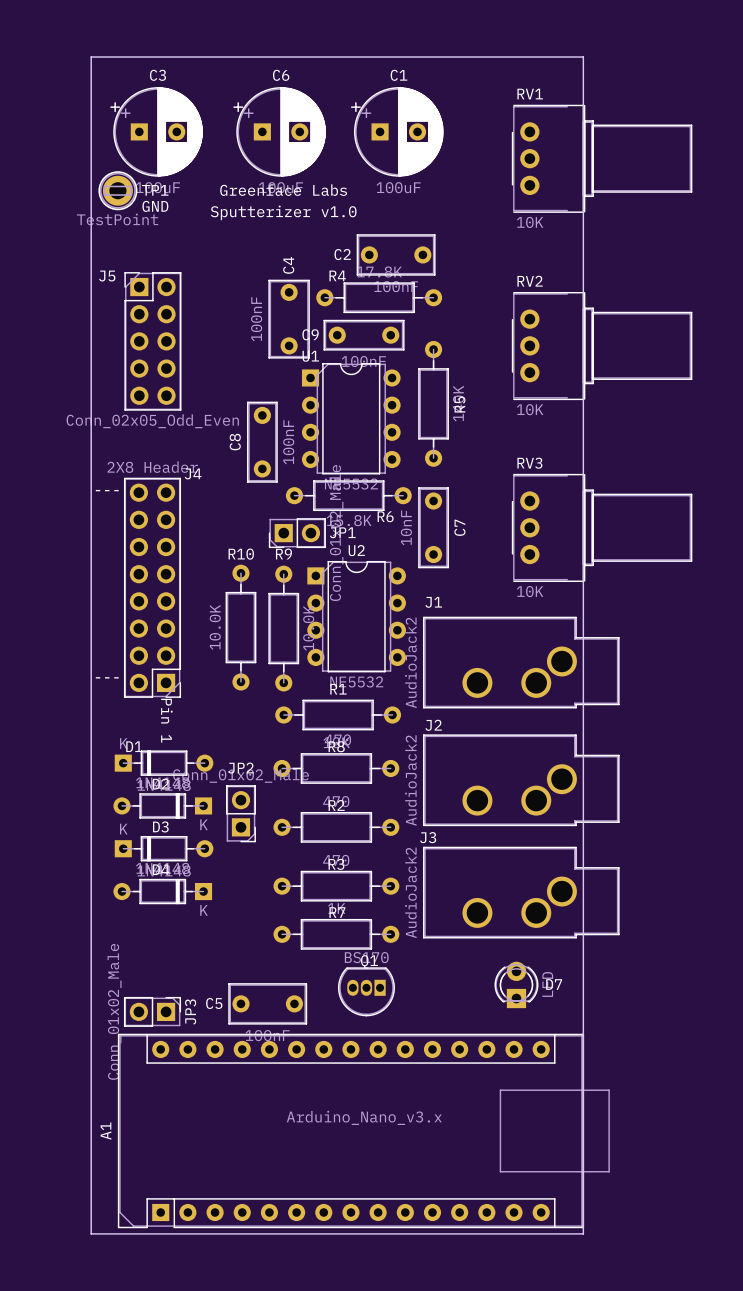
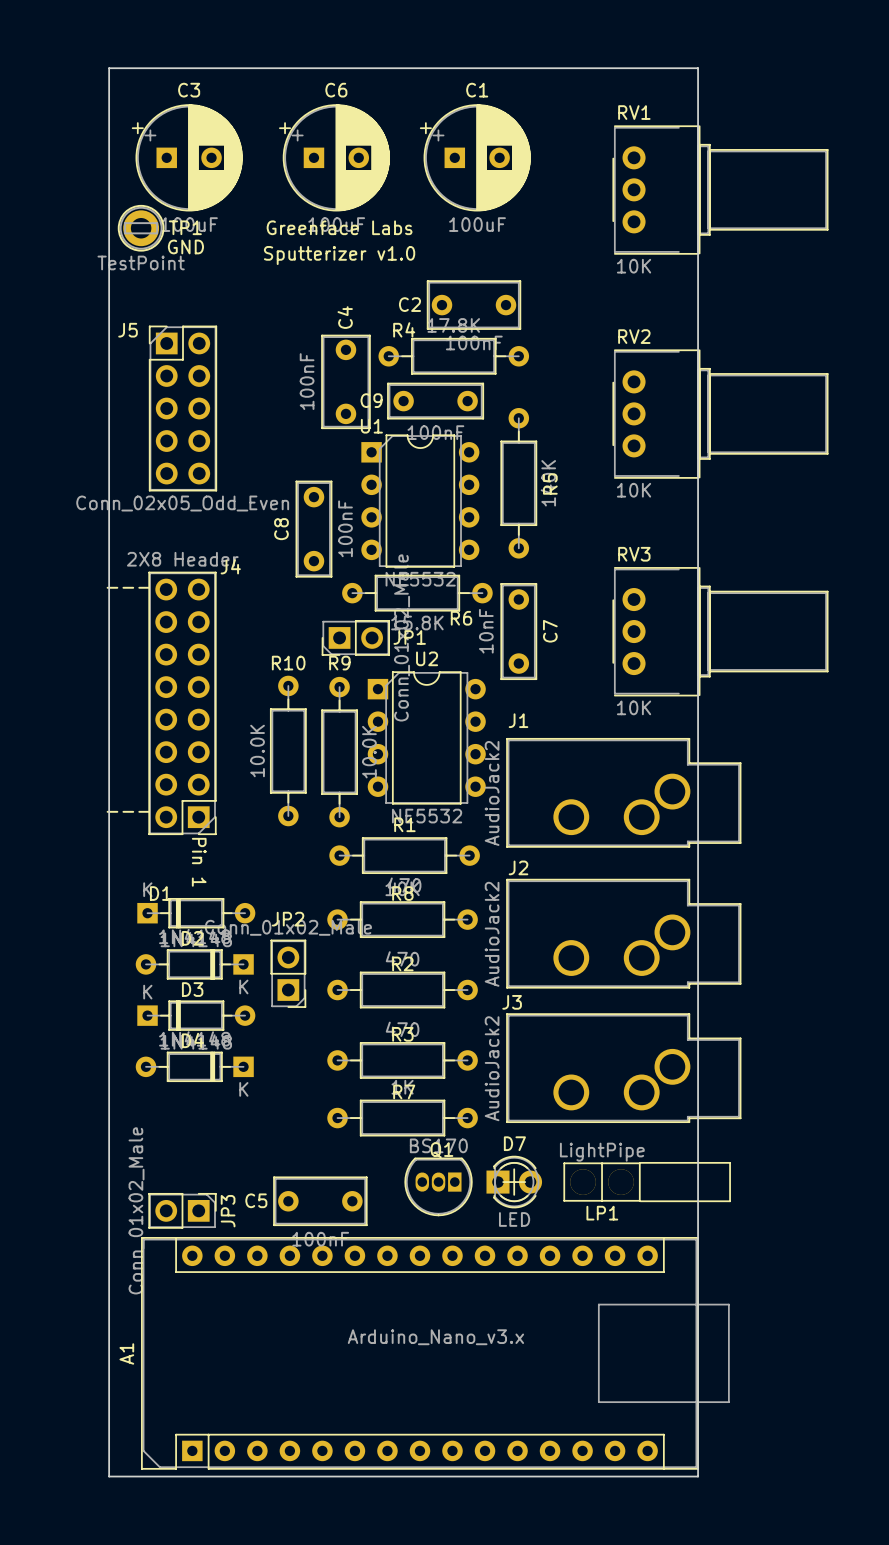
D7 rotation: 0° (516, 984) -> 90° clockwise (514, 1182)
D7 position: (516, 984) -> (514, 1182)
D7 name position: D7 (554, 984) -> D7 (514, 1143)
LP1: none -> LightPipe (616, 1182)

